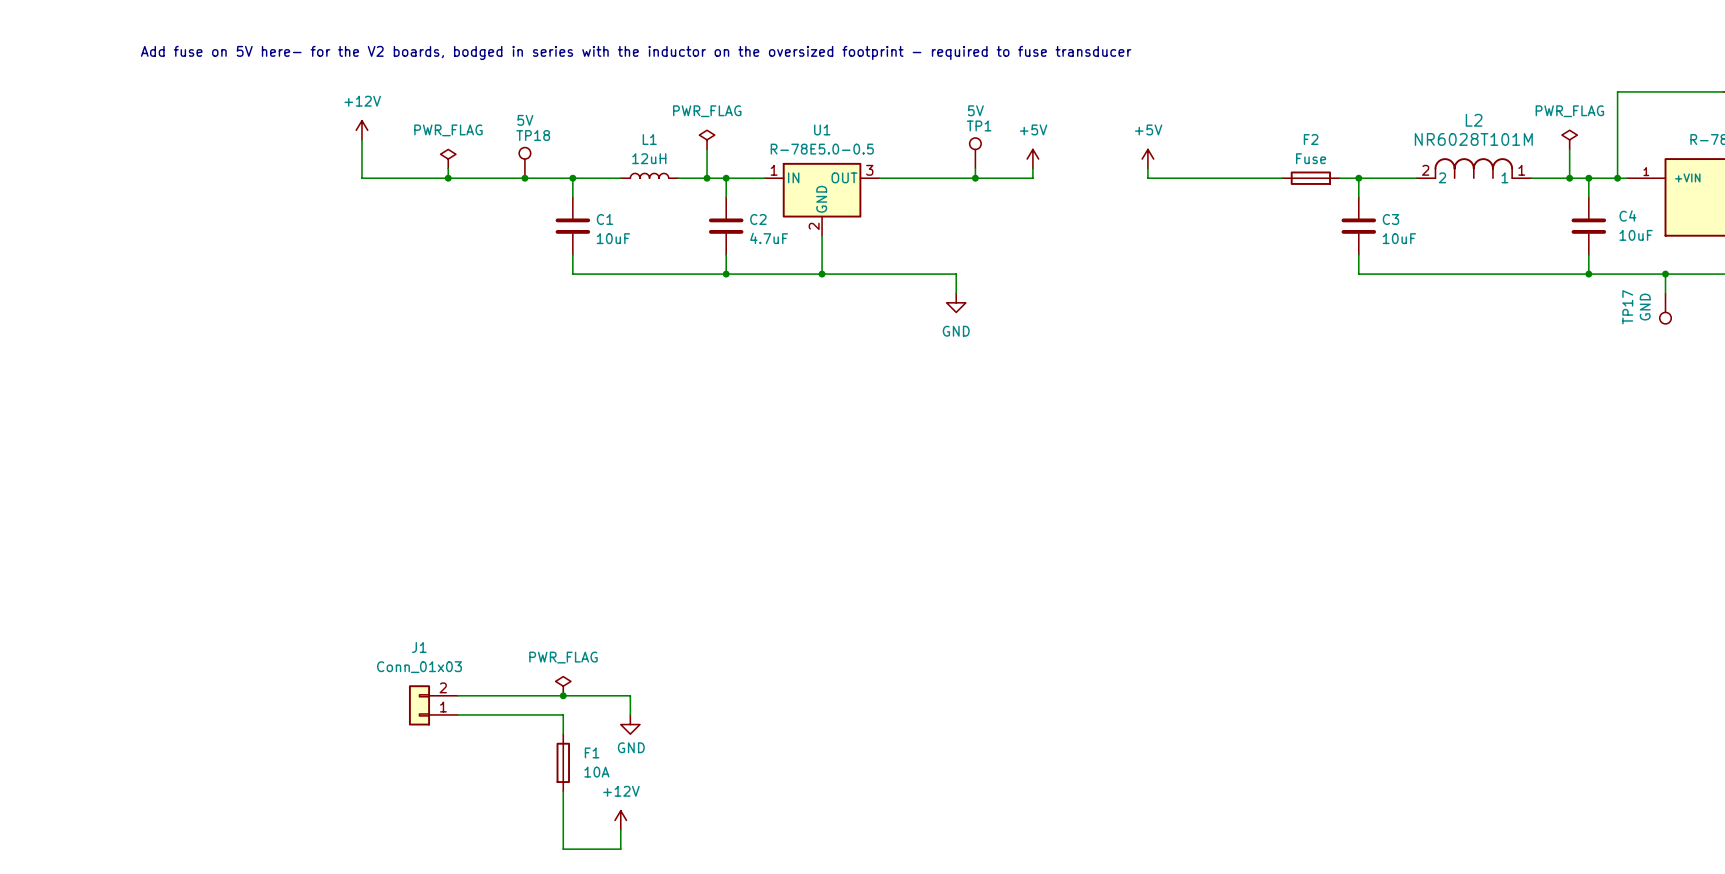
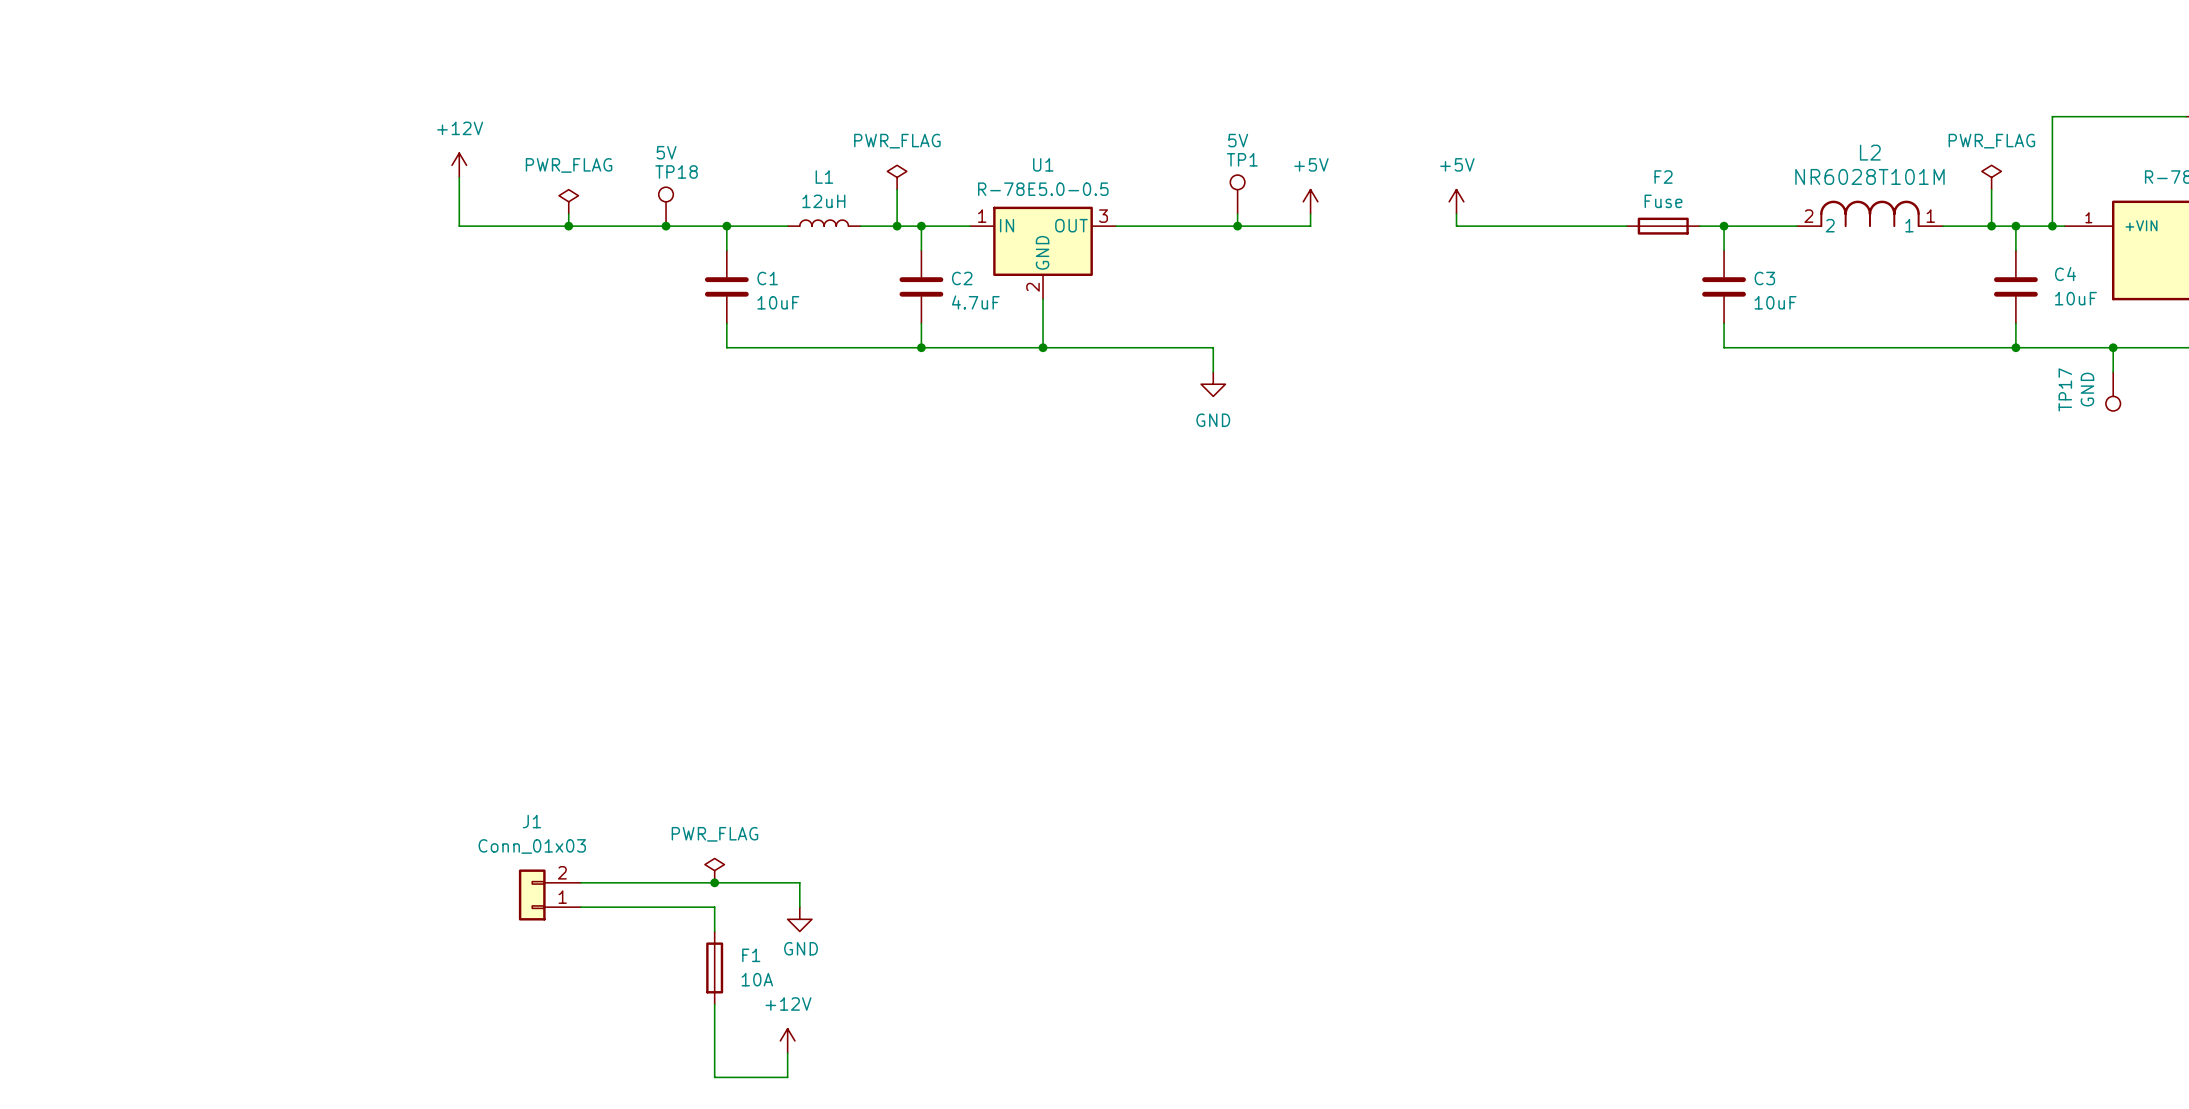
text: Add fuse on 5V here- for the V2 boards, bodged in series with the inductor on the oversized footprint - required to fuse transducer (636, 52) -> none

